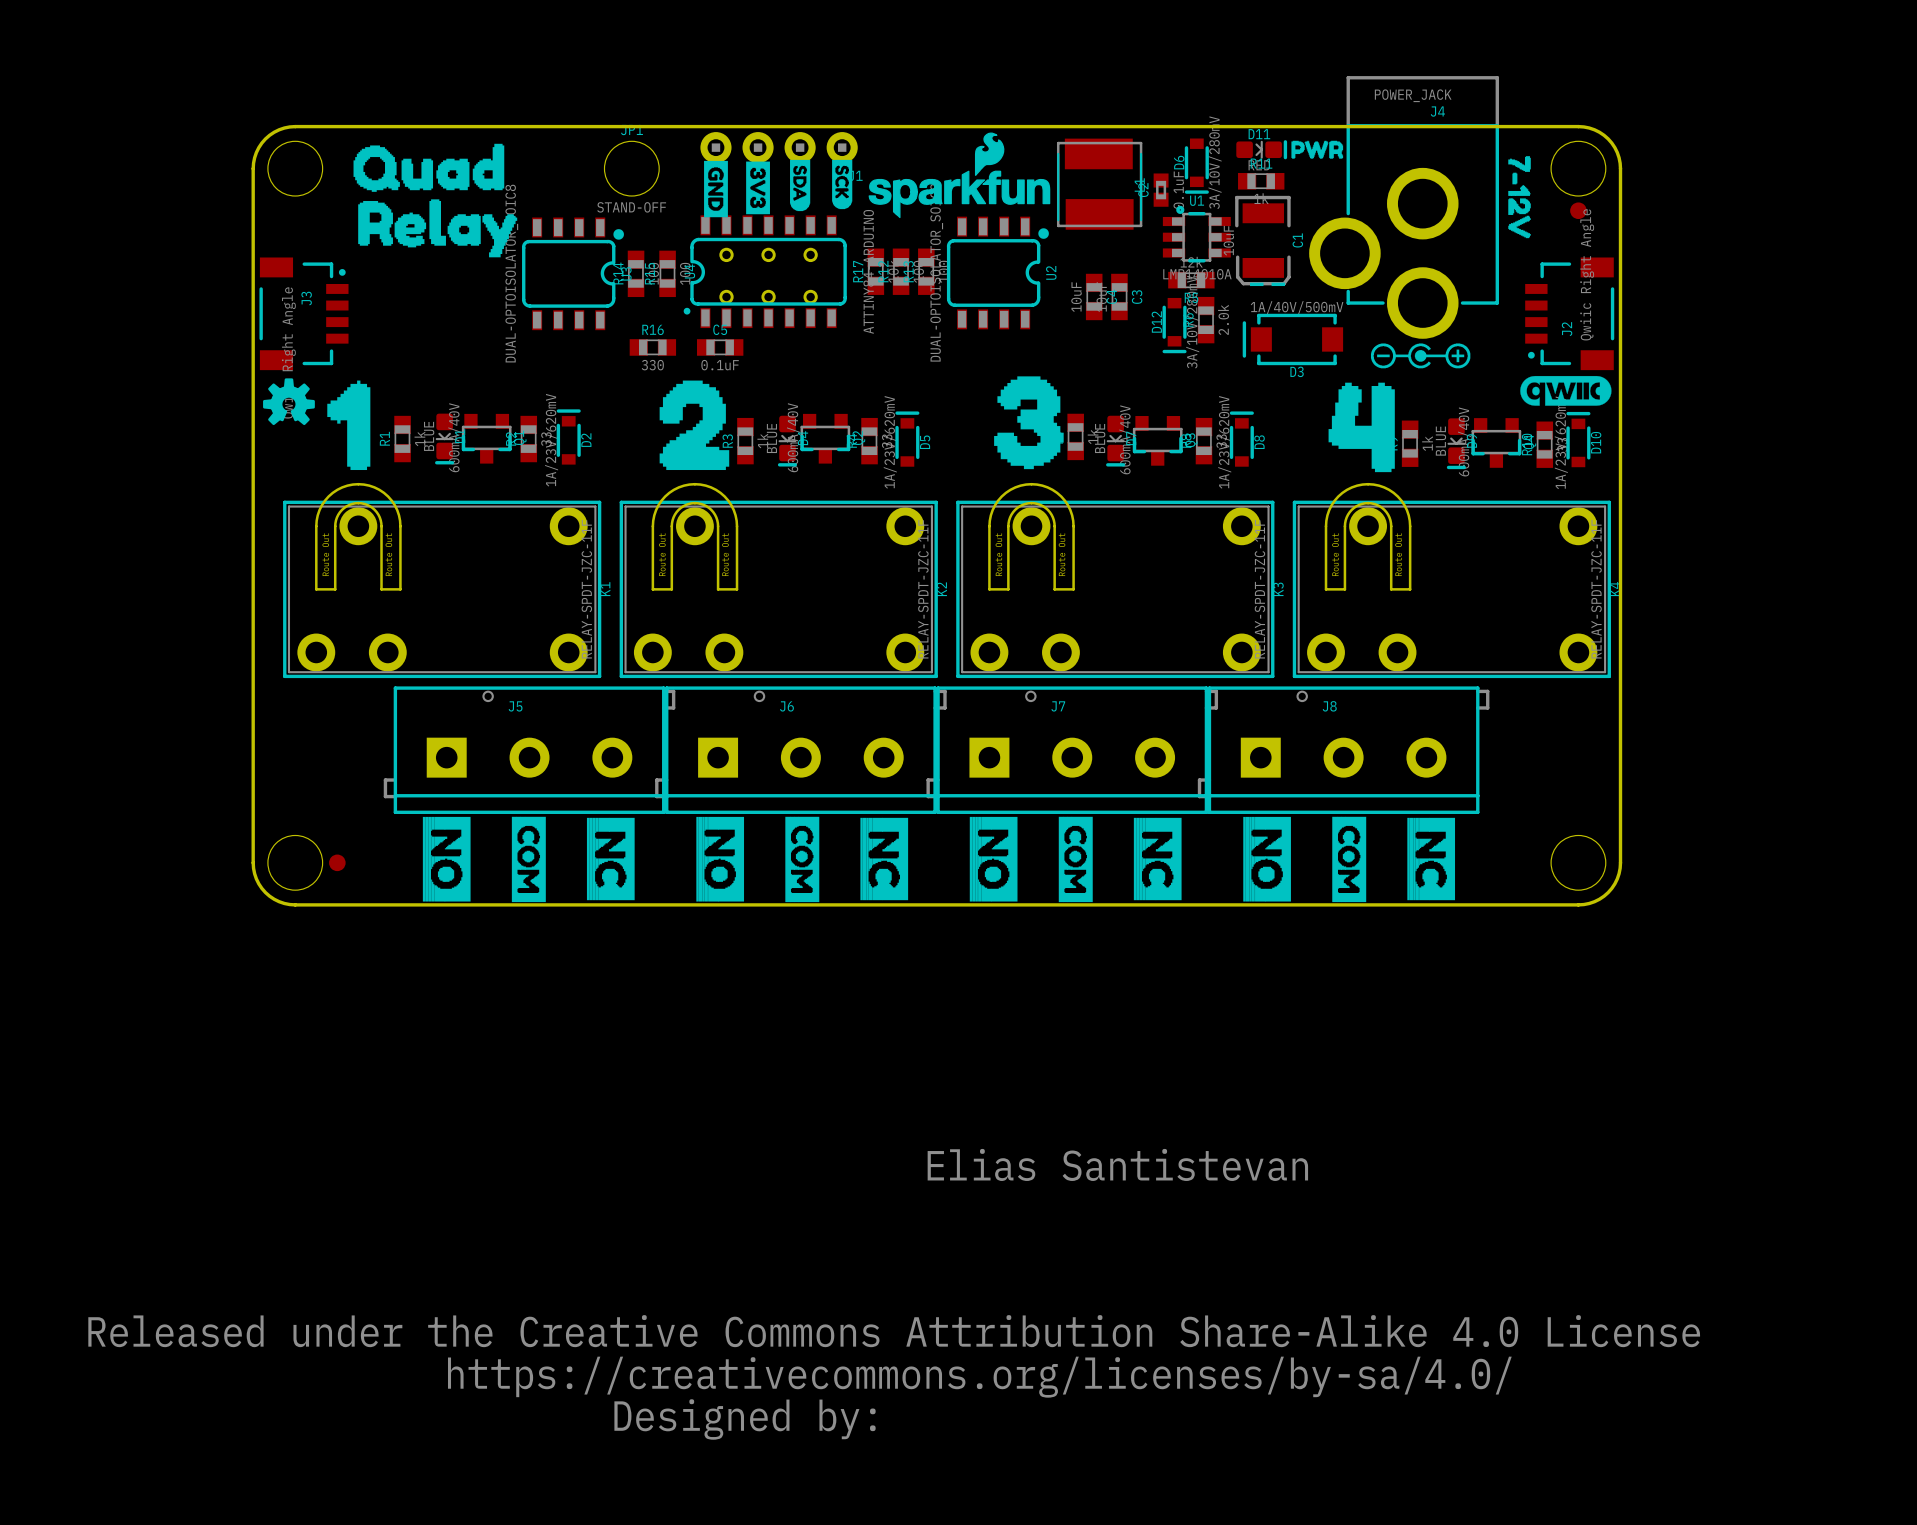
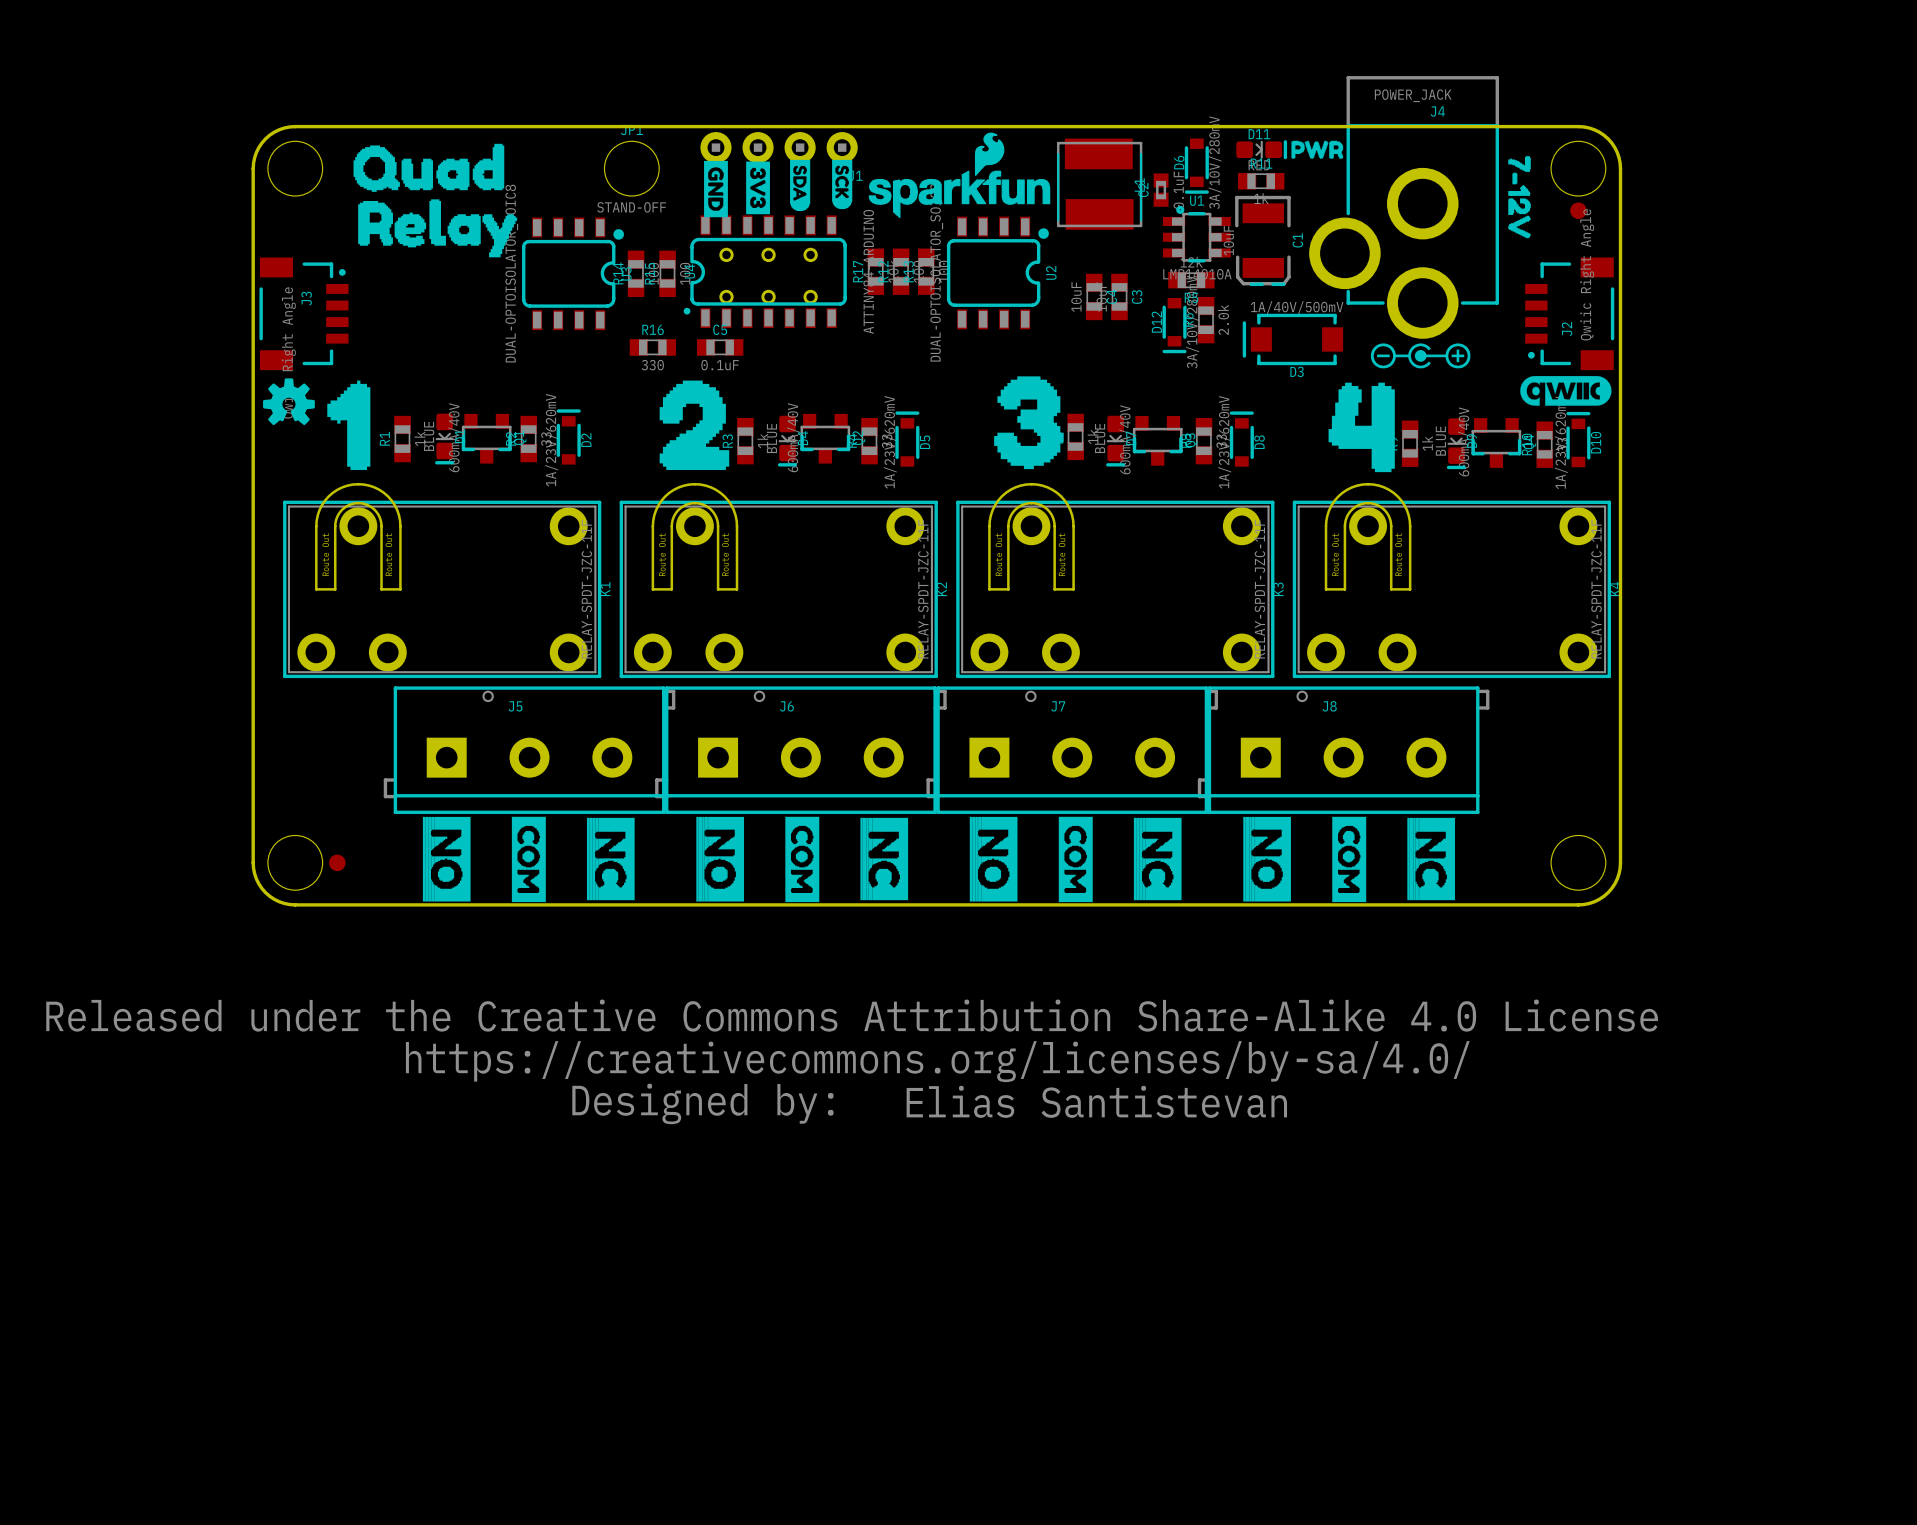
text position: Elias Santistevan (1117, 1164) -> Elias Santistevan (1096, 1101)
drawing position: (894, 1377) -> (852, 1061)

